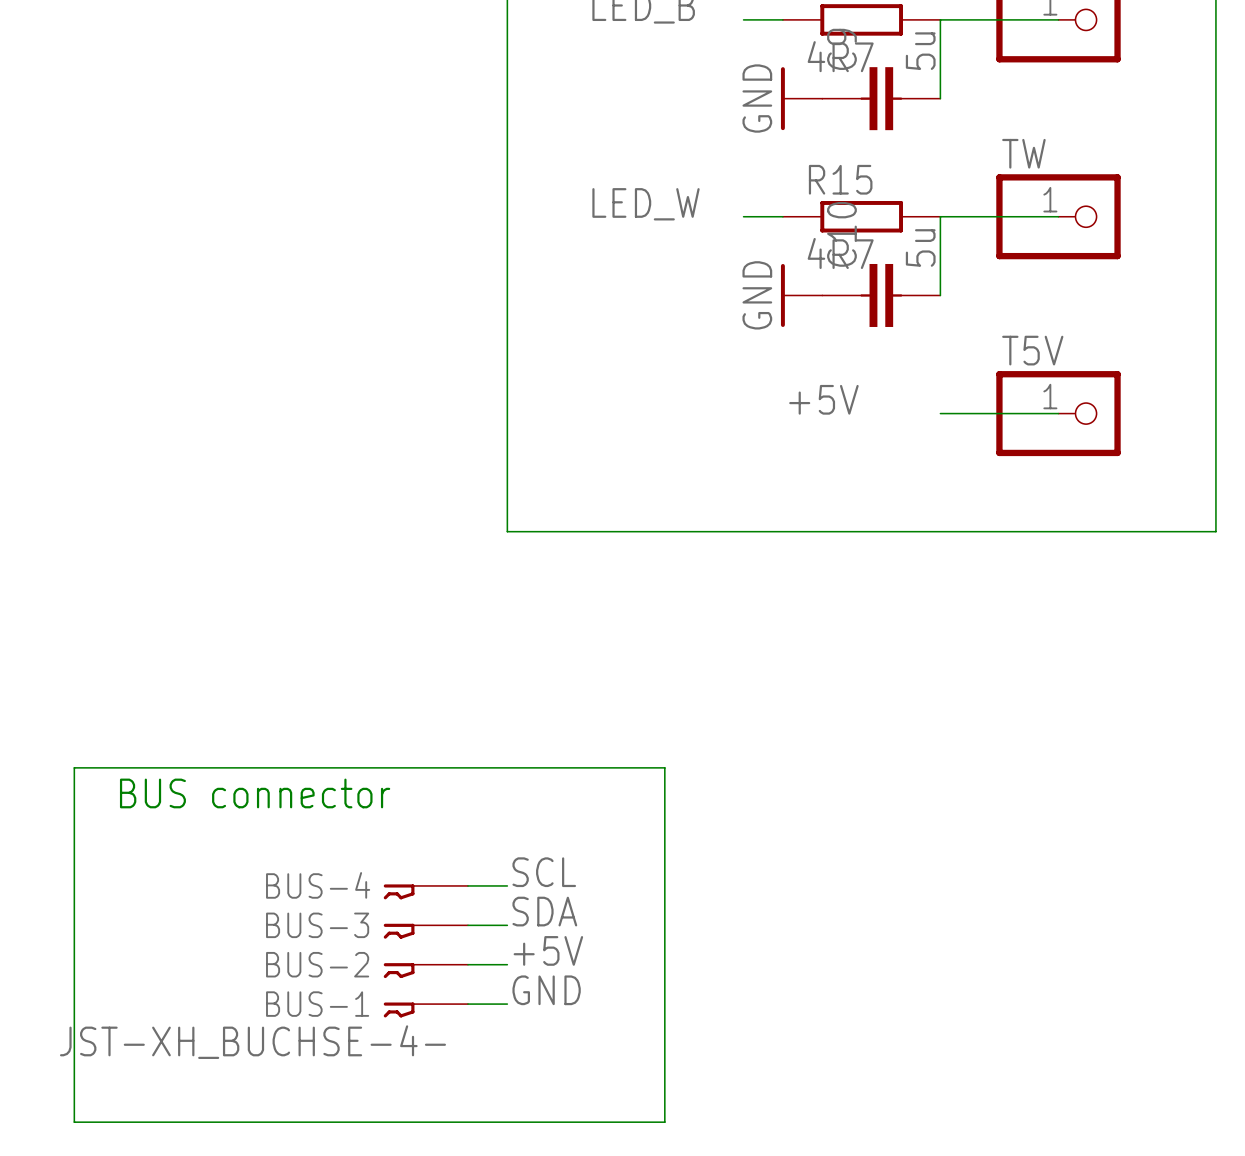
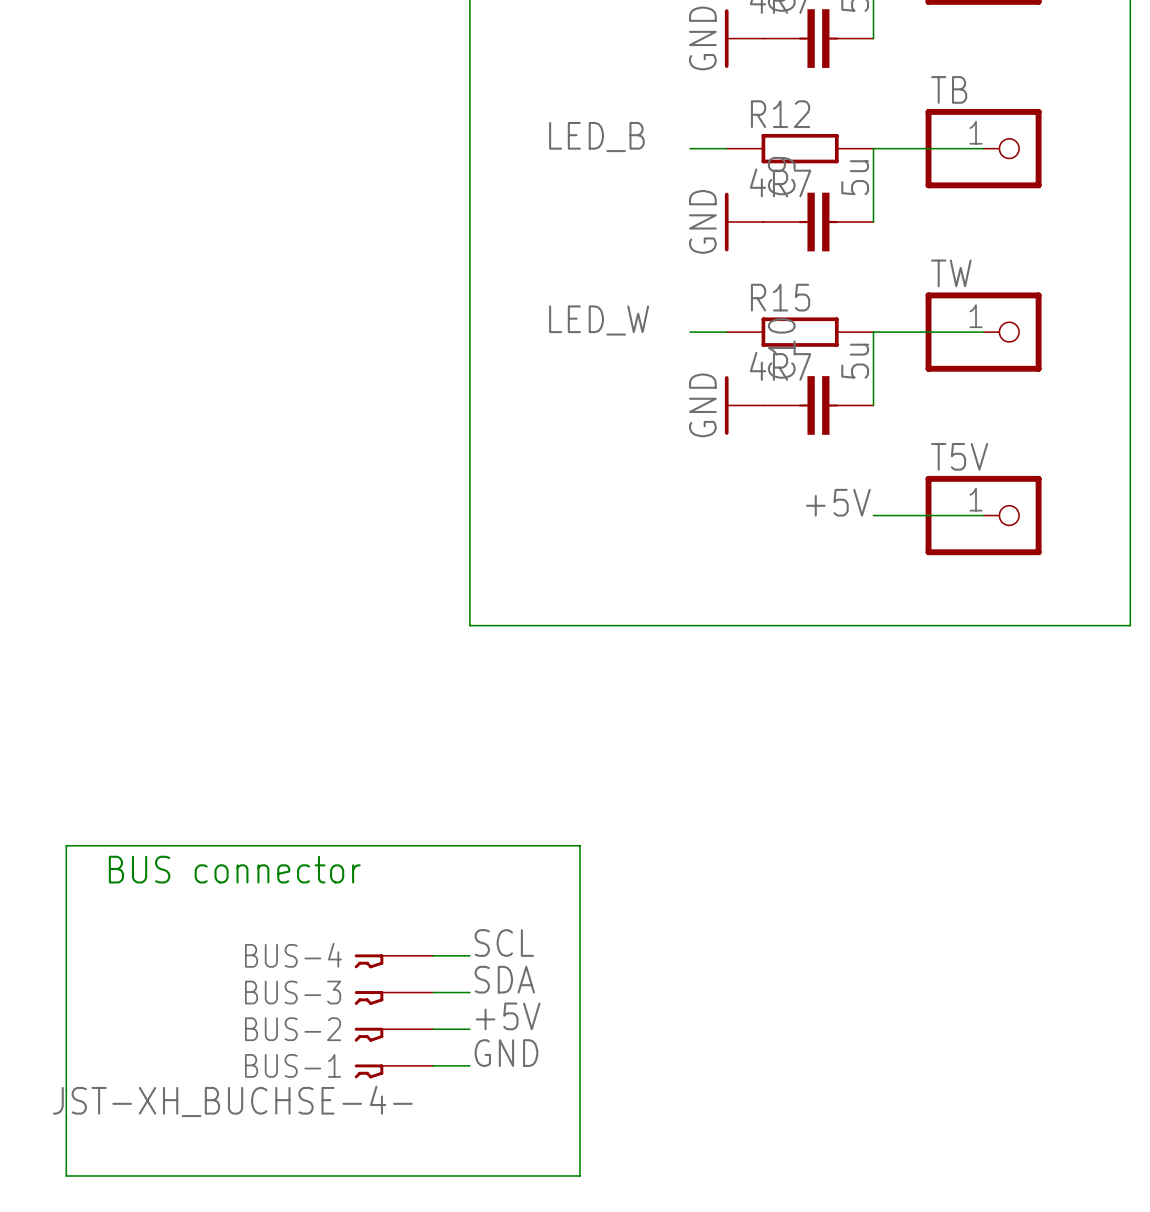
label position: +5V (823, 399) -> +5V (838, 502)
wire: (625, 767) (664, 767) (664, 1122) (625, 1122) -> (579, 845) (579, 1175)

